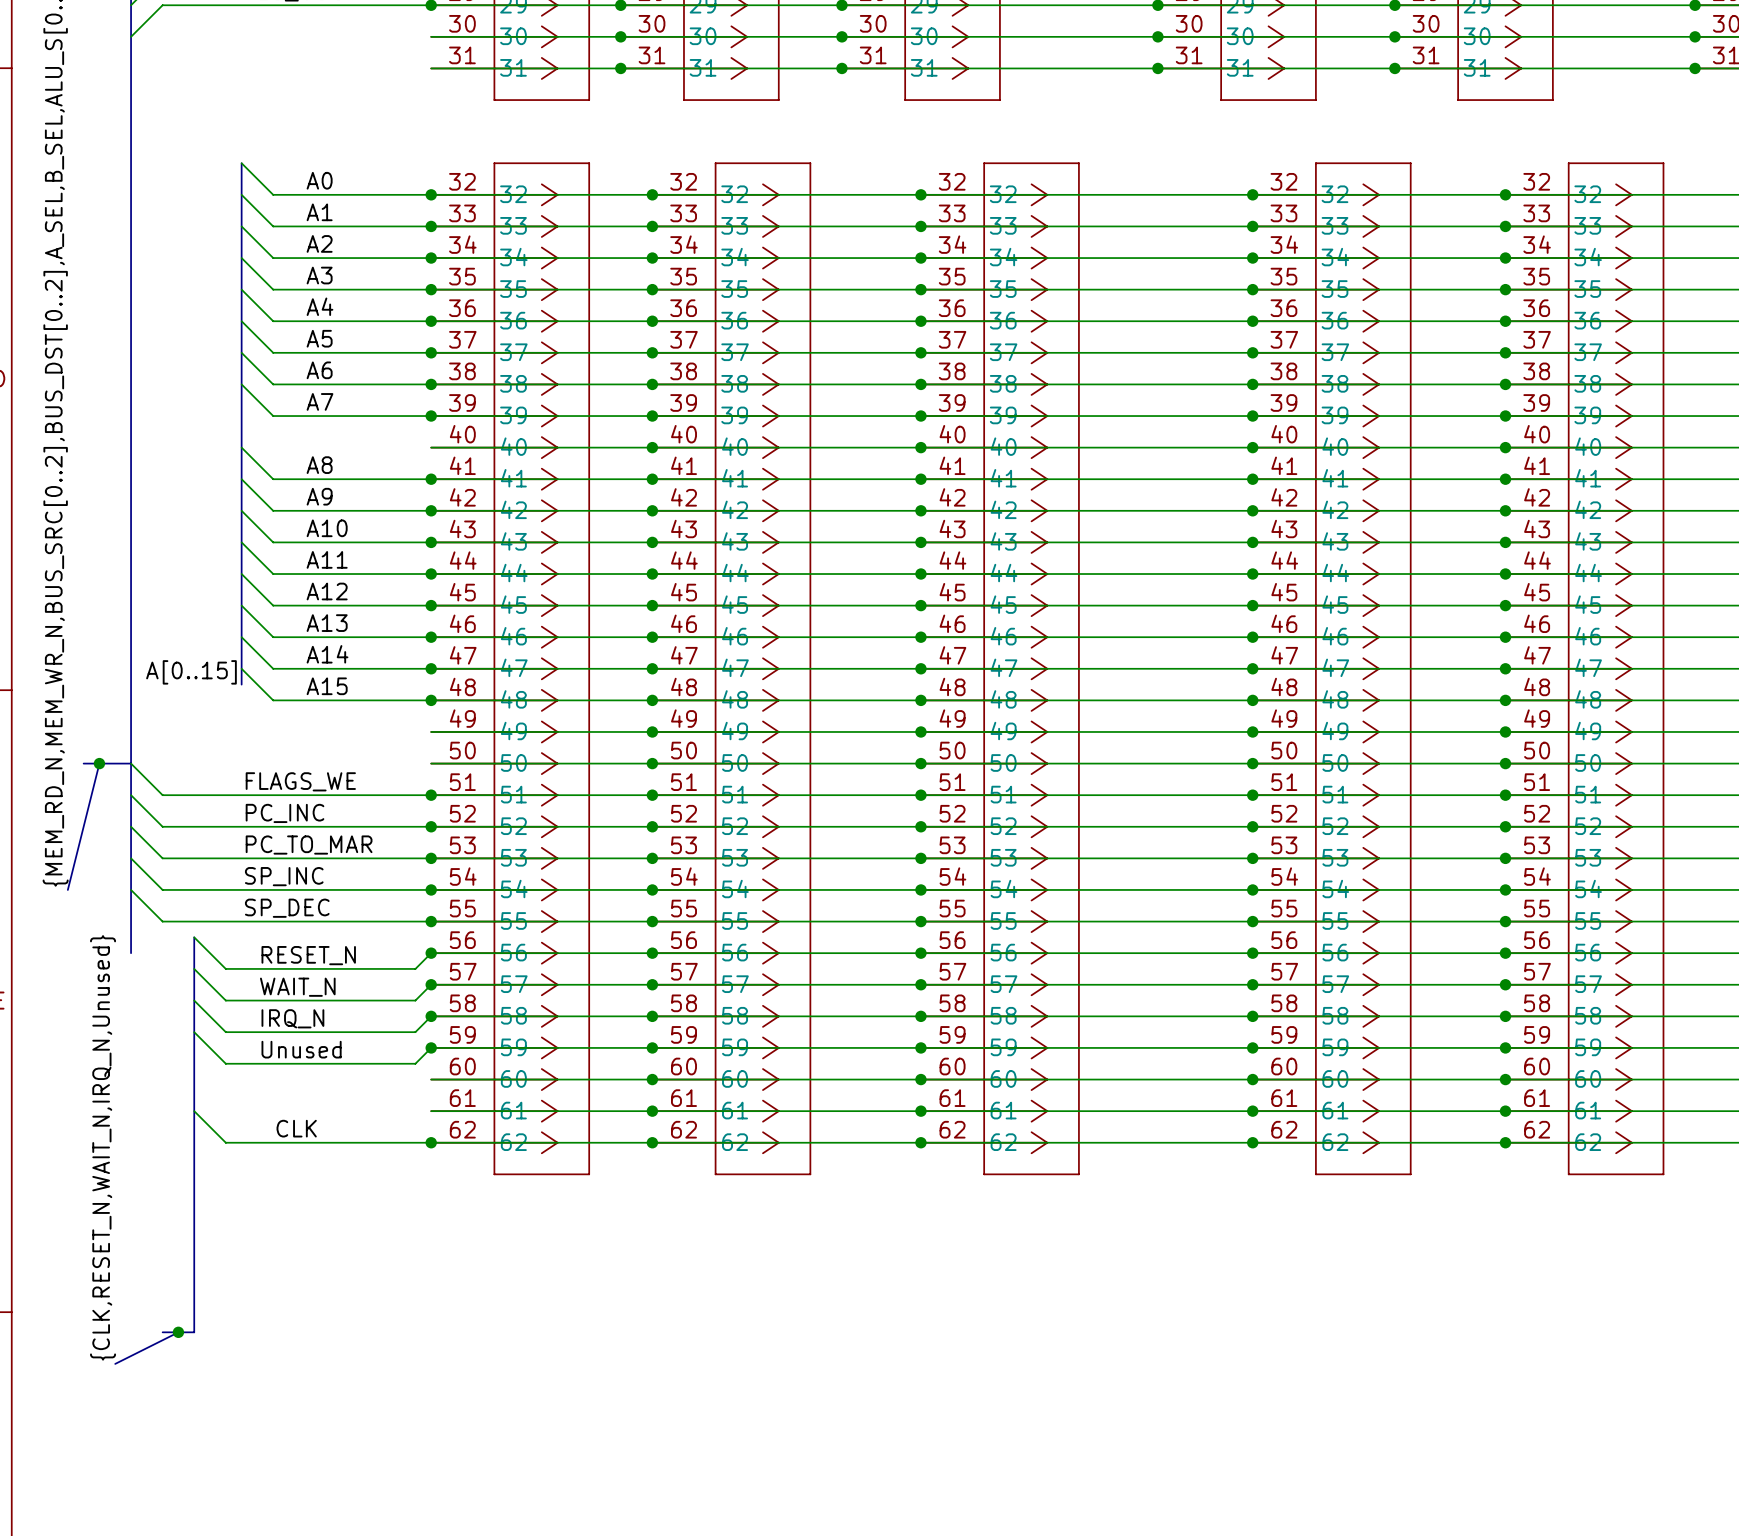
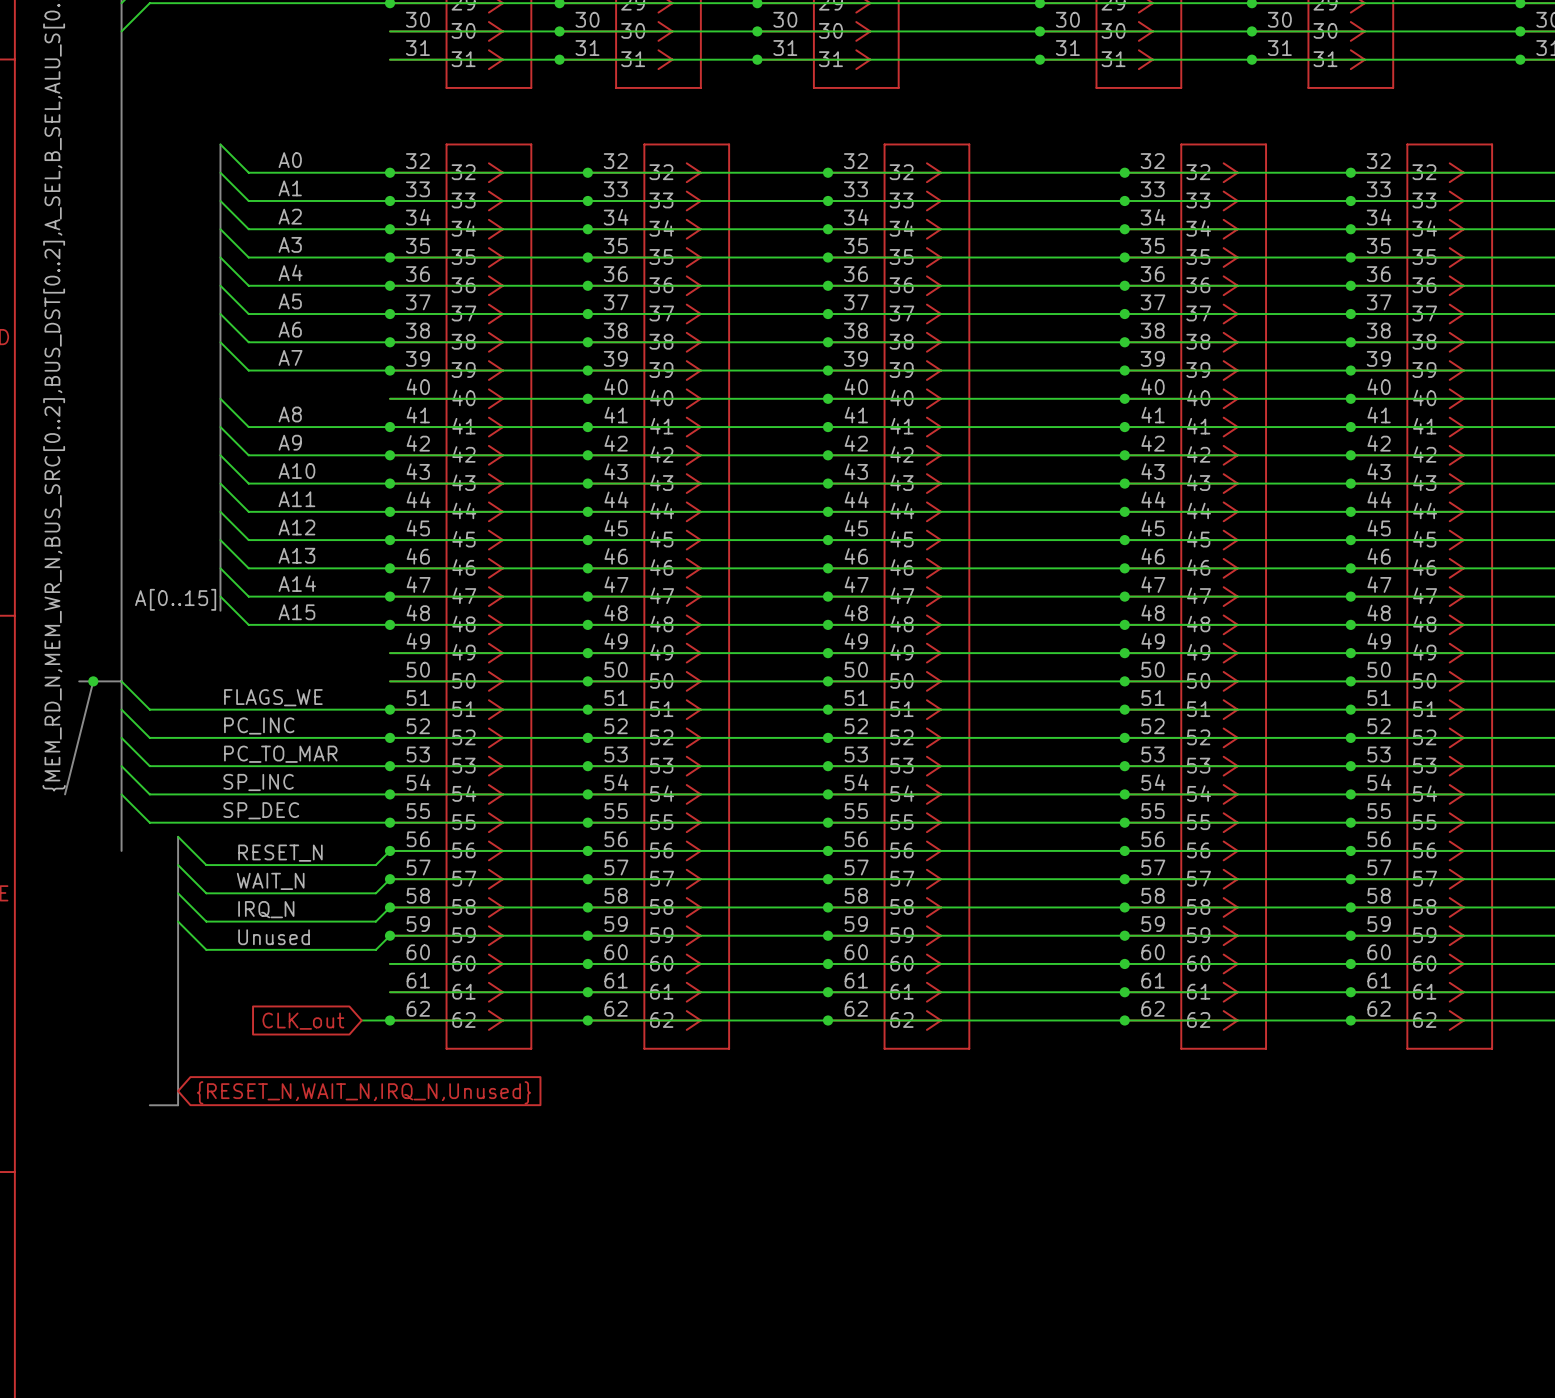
wire: (194, 1111) (225, 1142) (399, 1142) -> none
label: CLK (296, 1128) -> none
global label: none -> CLK_out (303, 1021)
label: {CLK,RESET_N,WAIT_N,IRQ_N,Unused} (103, 1147) -> none
global label: none -> {RESET_N,WAIT_N,IRQ_N,Unused} (363, 1092)
bus: (194, 1237) (194, 1332) (162, 1332) -> (178, 1105) (149, 1105)
bus: (178, 1332) (115, 1363) -> none
junction: (178, 1332) -> none

